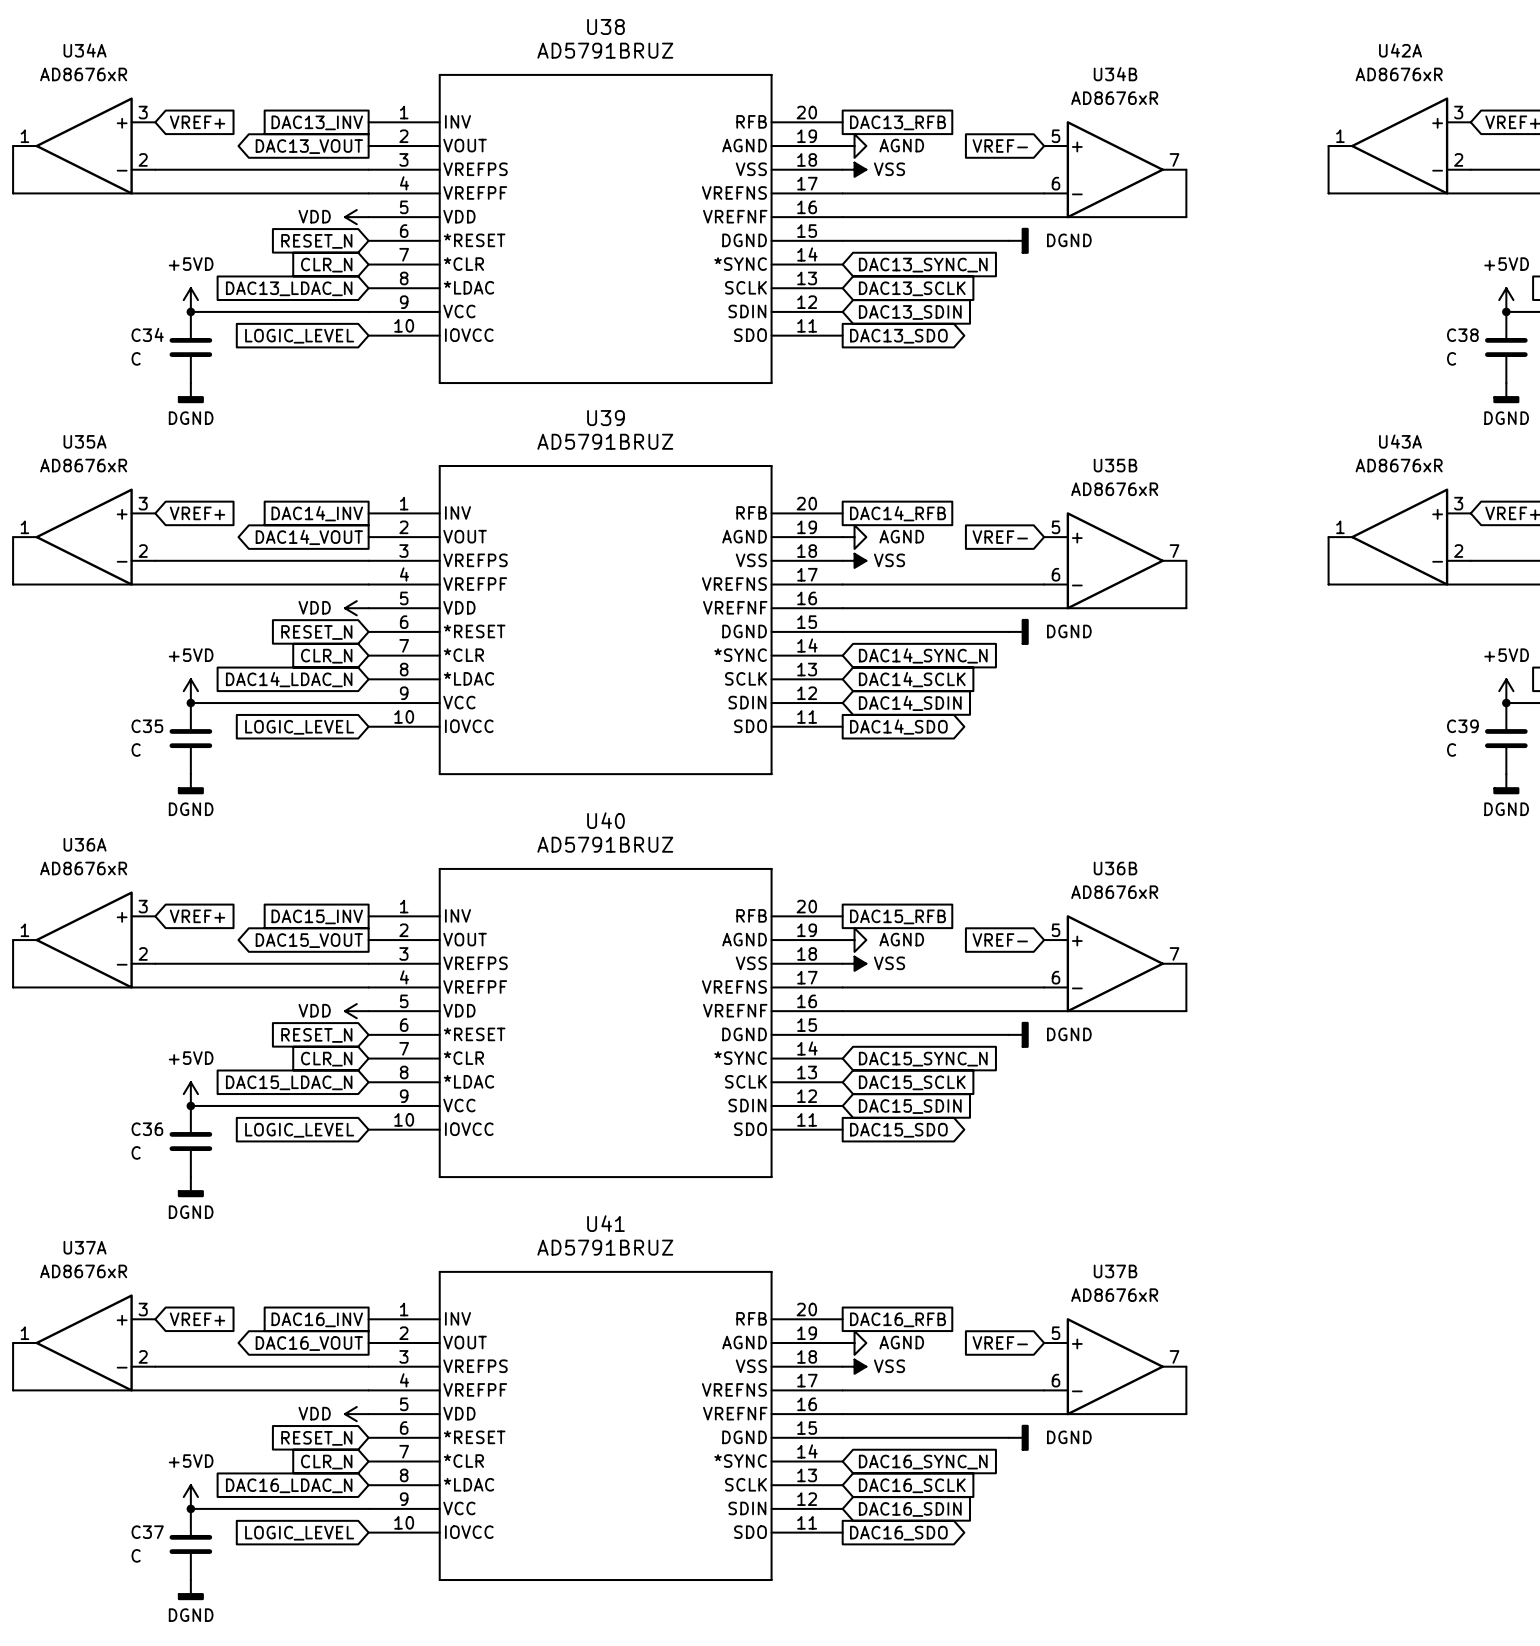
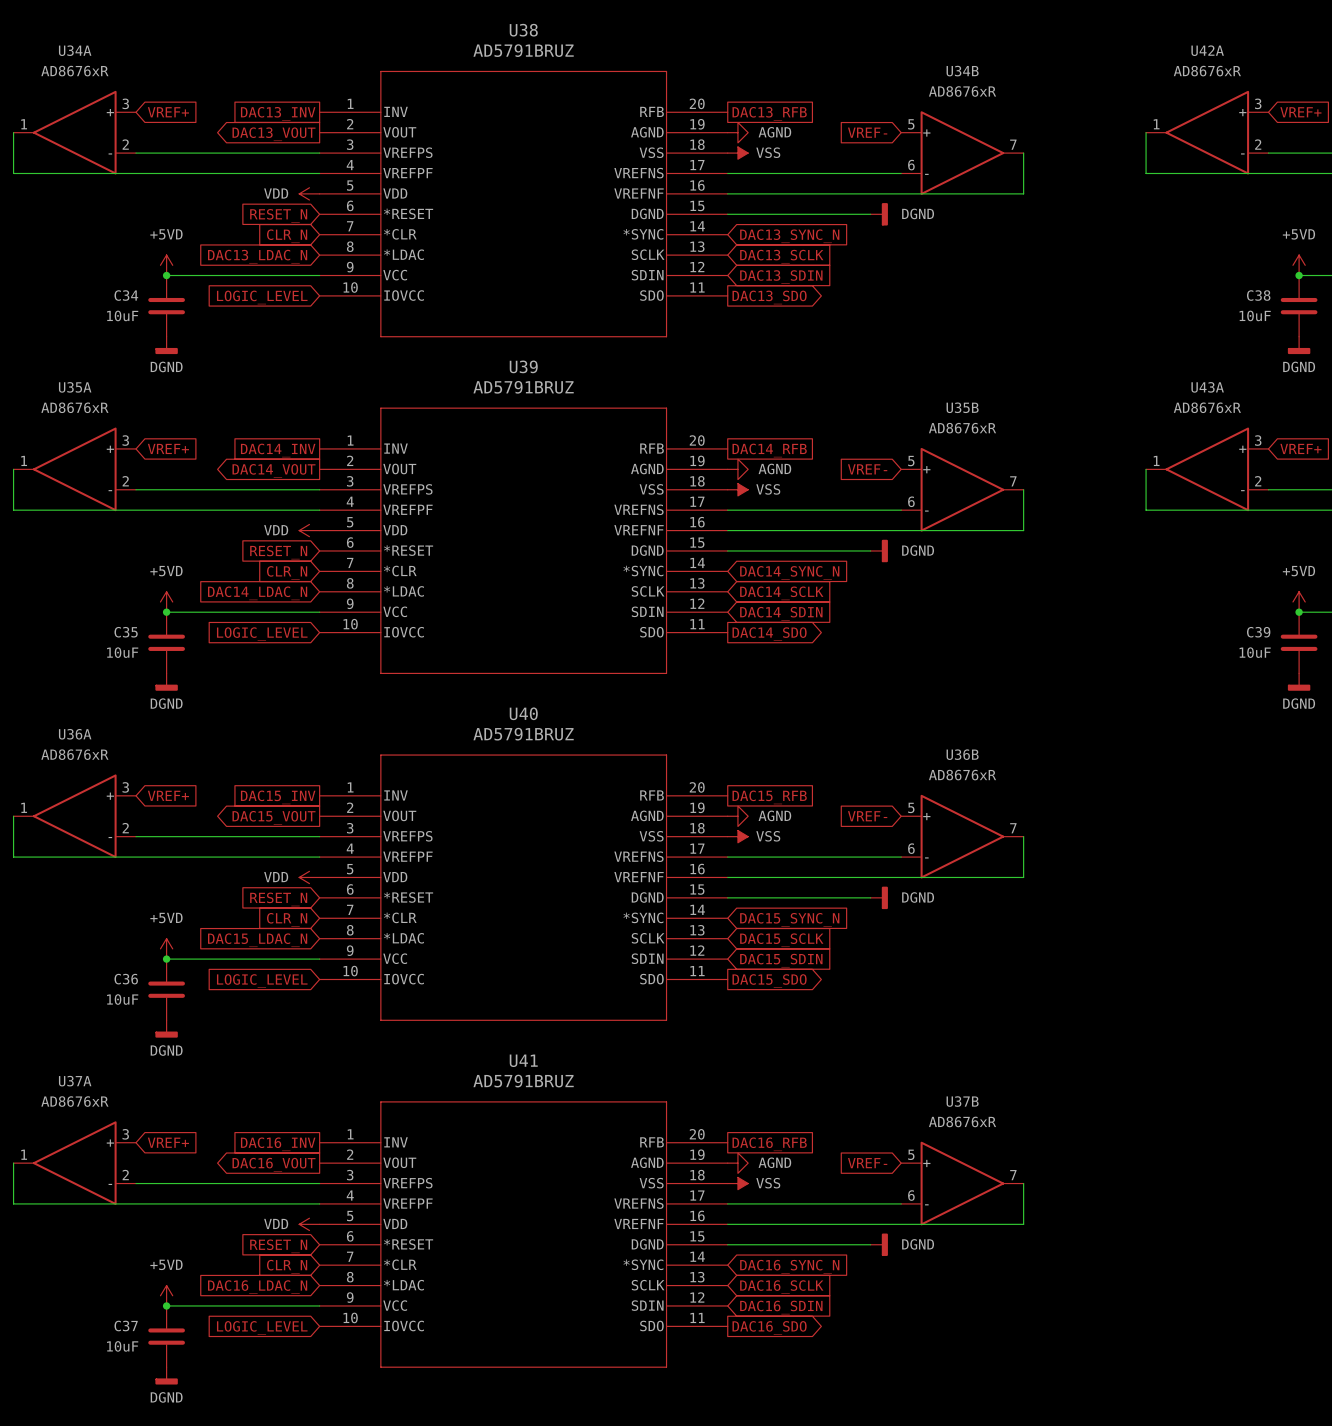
C34 value: C (136, 358) -> 10uF (122, 315)
C38 value: C (1451, 358) -> 10uF (1255, 315)
C35 value: C (136, 749) -> 10uF (122, 652)
C39 value: C (1451, 749) -> 10uF (1255, 652)
C36 value: C (136, 1152) -> 10uF (122, 999)
C37 value: C (136, 1555) -> 10uF (122, 1346)

